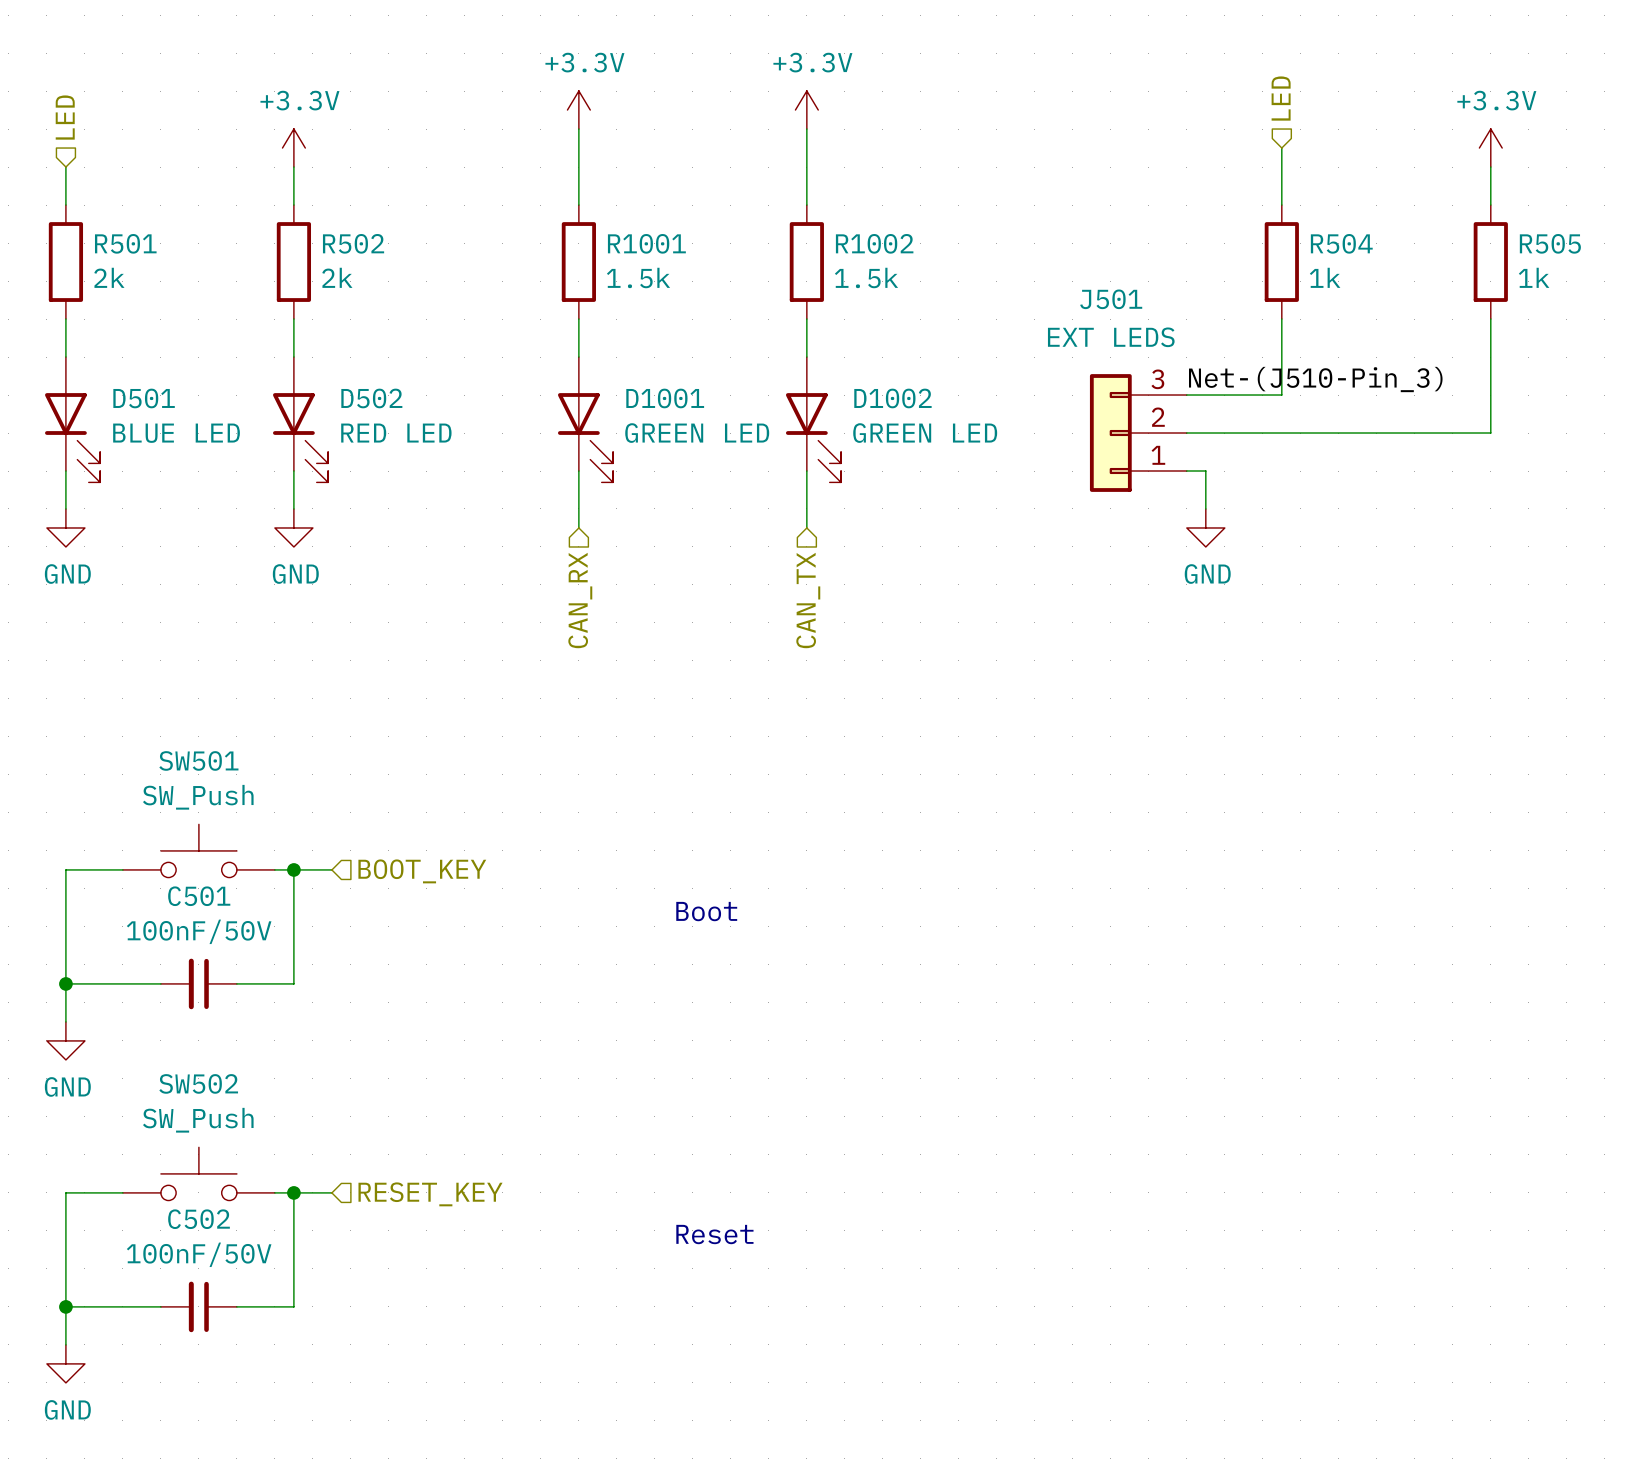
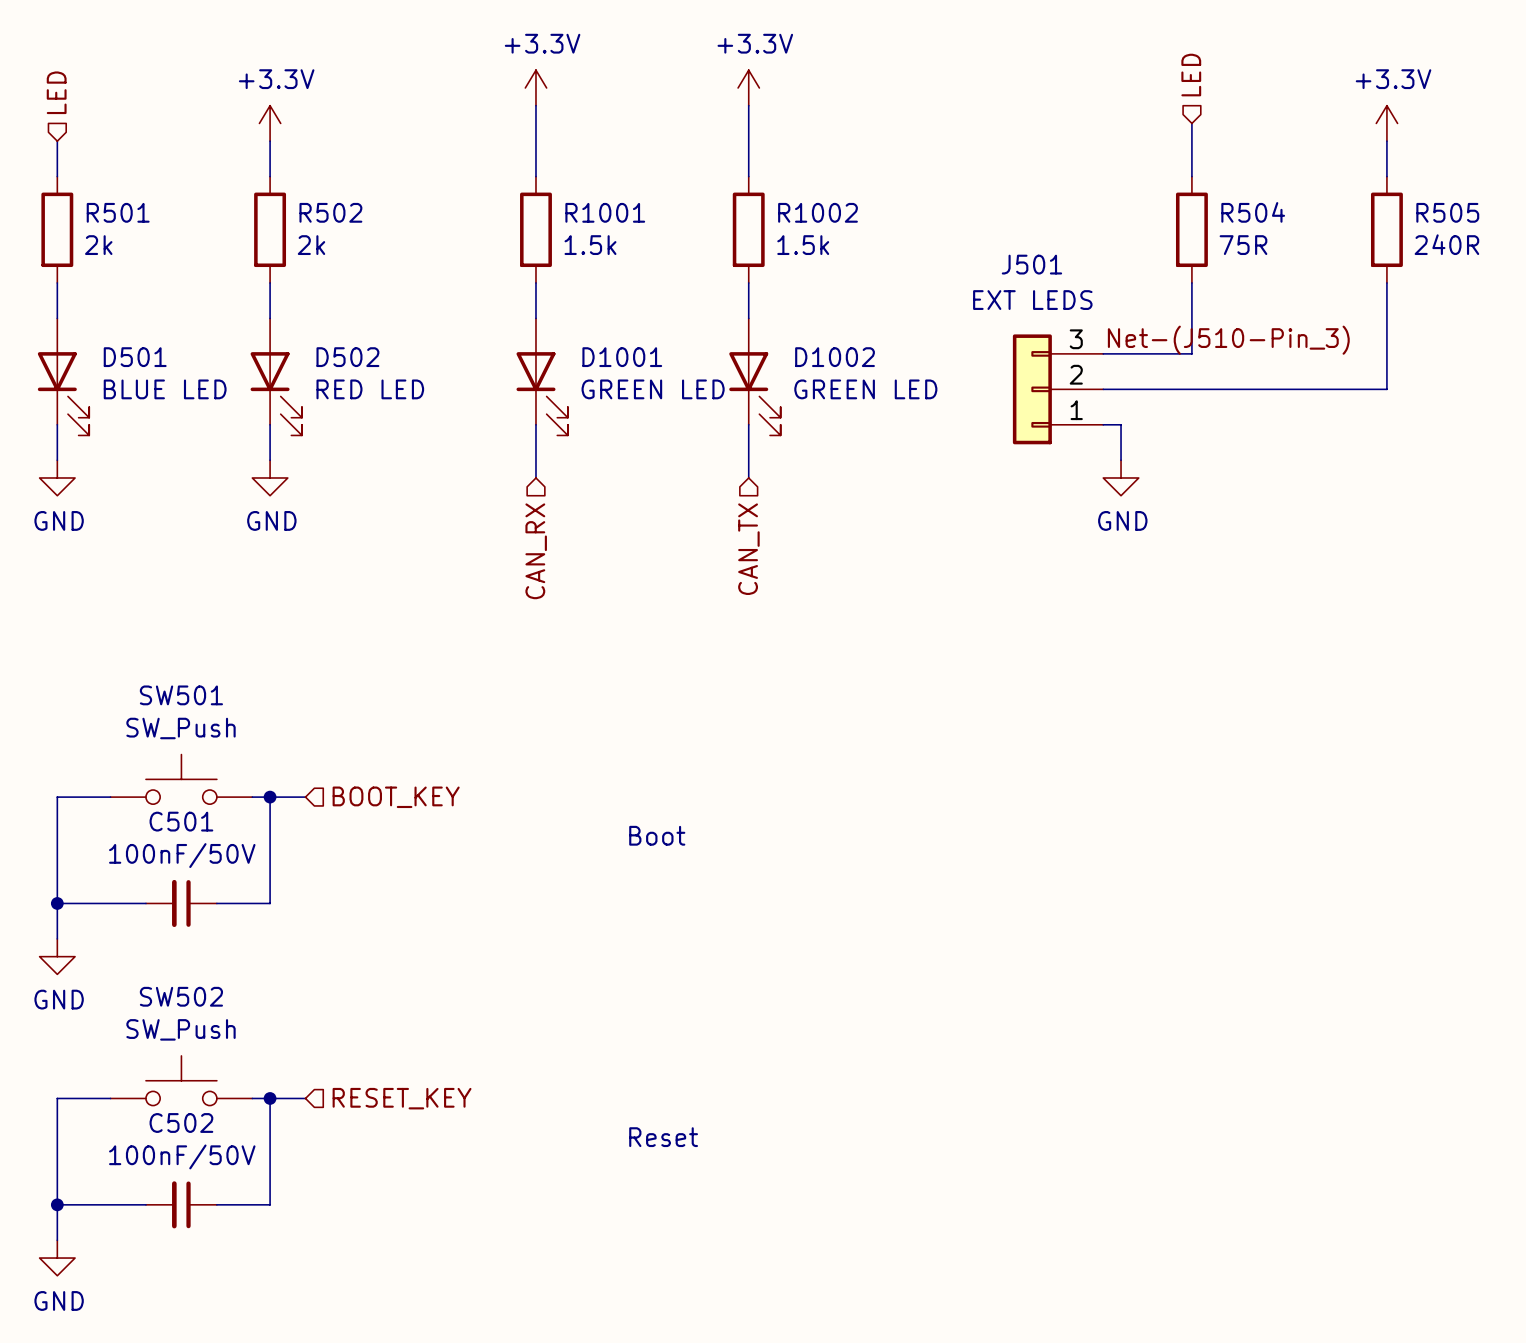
R504 value: 1k (1325, 277) -> 75R (1243, 245)
R505 value: 1k (1534, 277) -> 240R (1446, 244)

